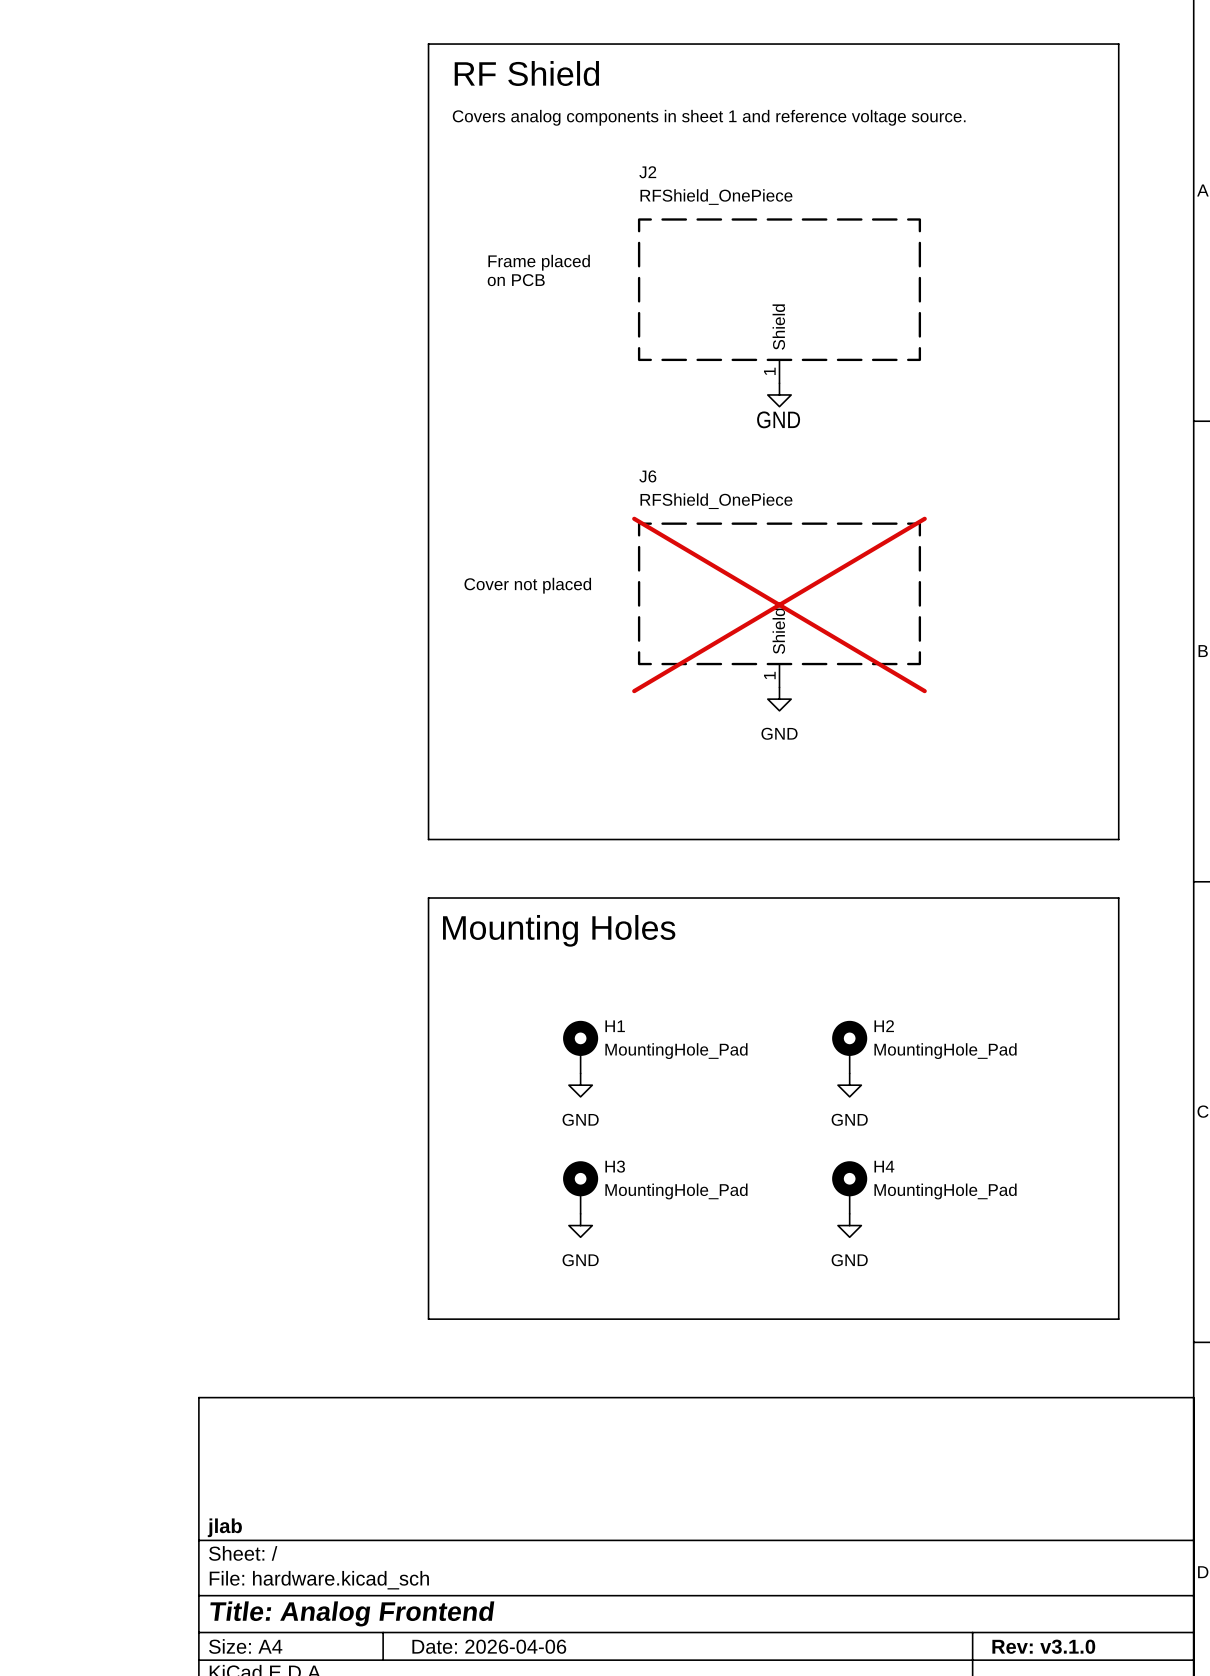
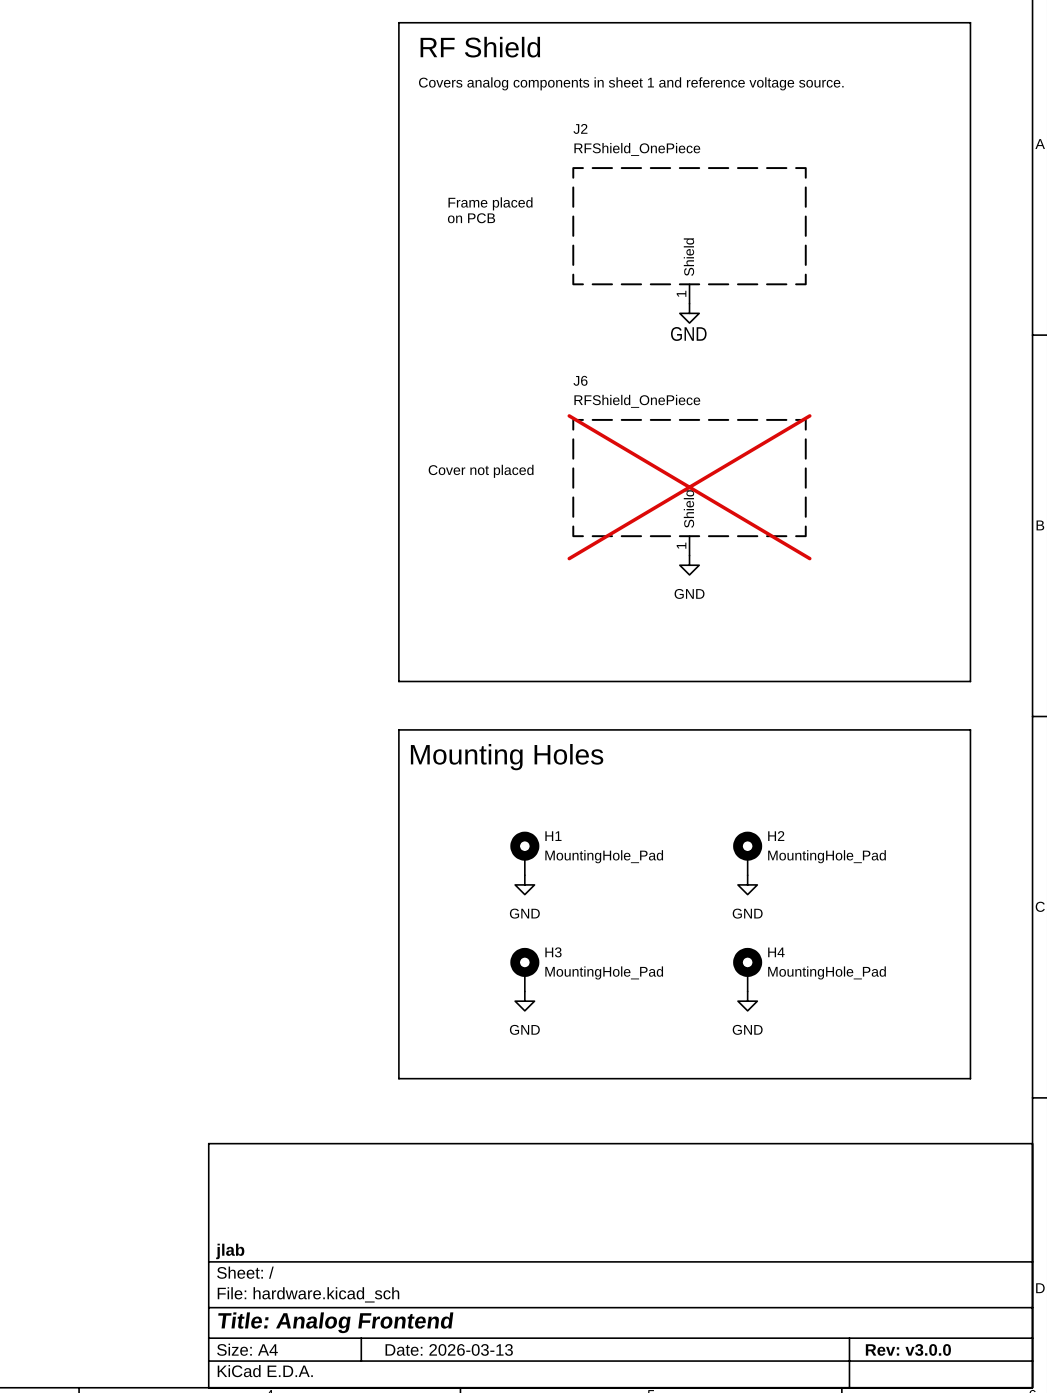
title block: Date: 2026-04-06 (489, 1646) -> Date: 2026-03-13 (449, 1349)
title block: Rev: v3.1.0 (1043, 1646) -> Rev: v3.0.0 (908, 1349)

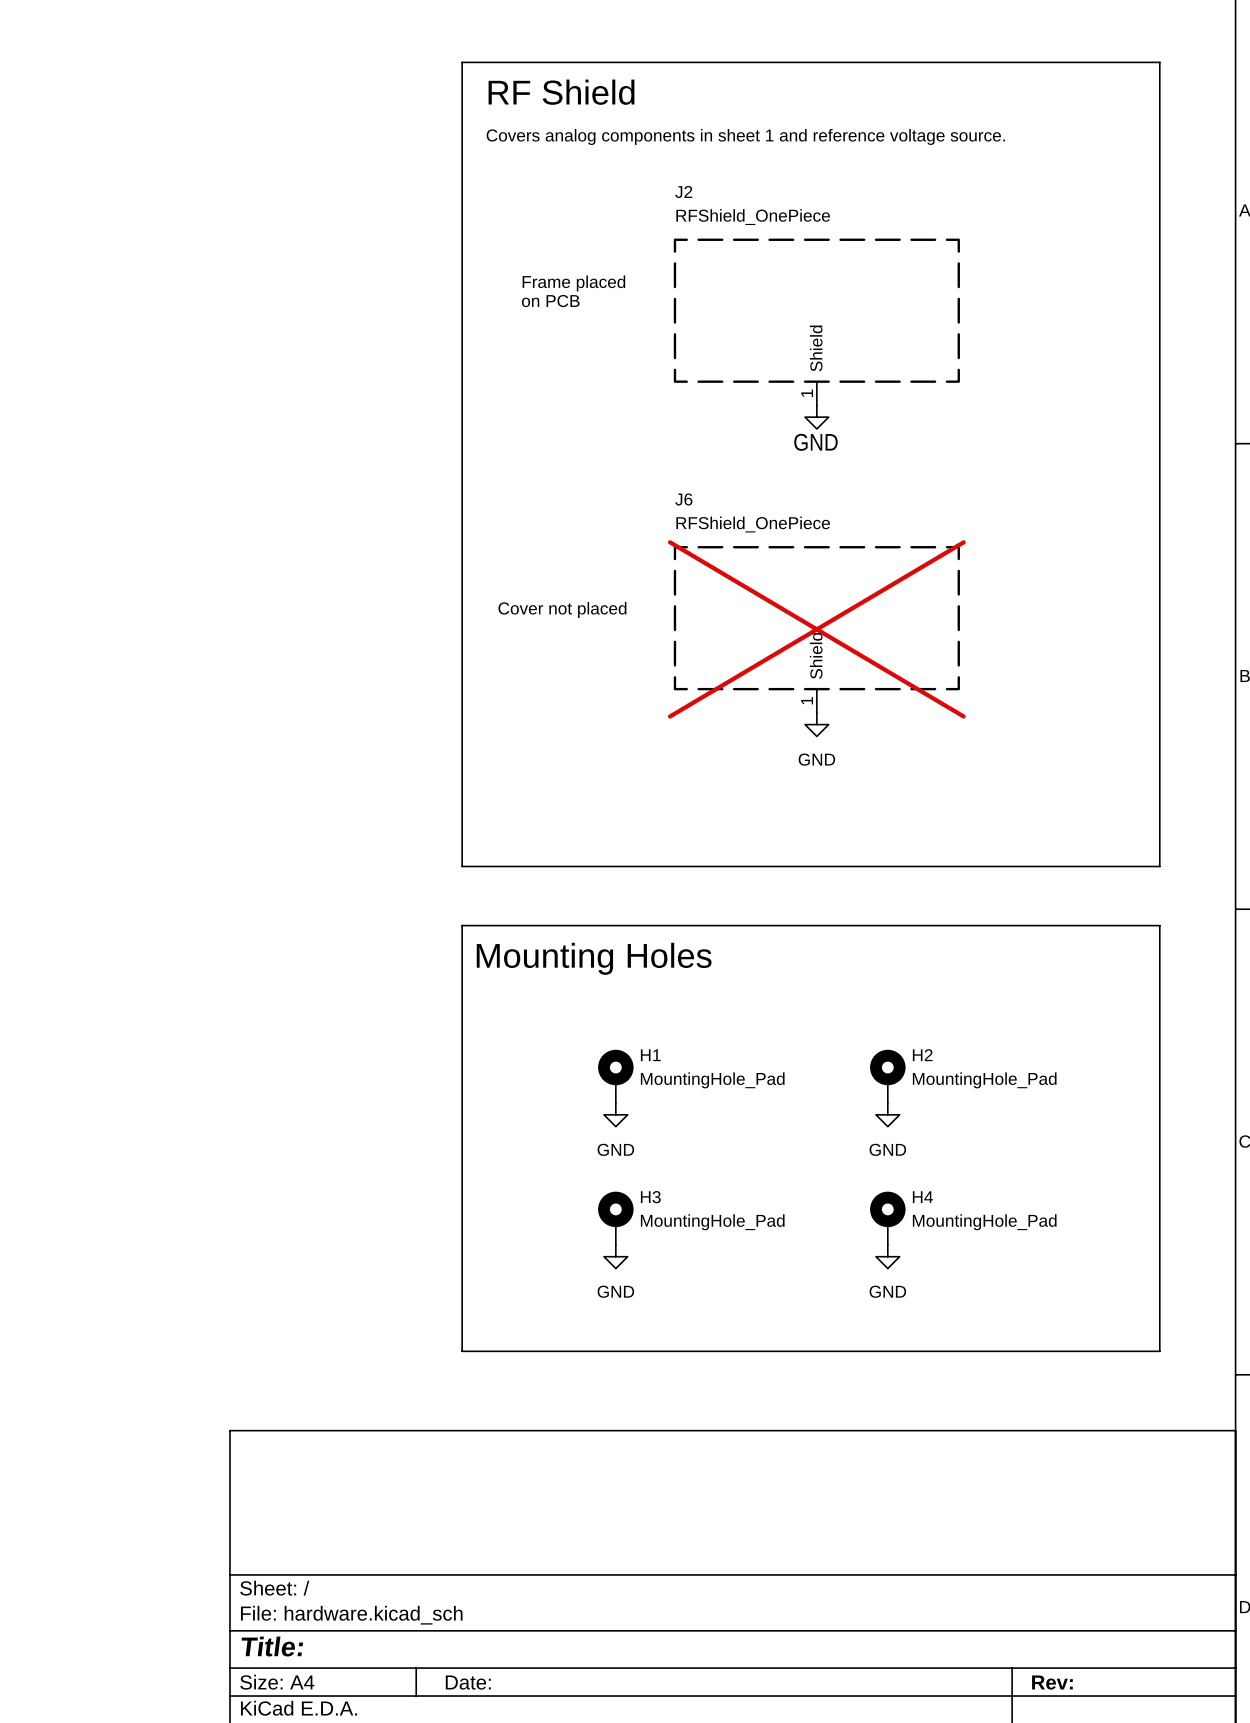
title block: jlab (230, 1251) -> none
title block: Title: Analog Frontend (335, 1322) -> Title: (272, 1646)
title block: Date: 2026-03-13 (449, 1349) -> Date: (468, 1682)
title block: Rev: v3.0.0 (908, 1349) -> Rev: (1052, 1682)

